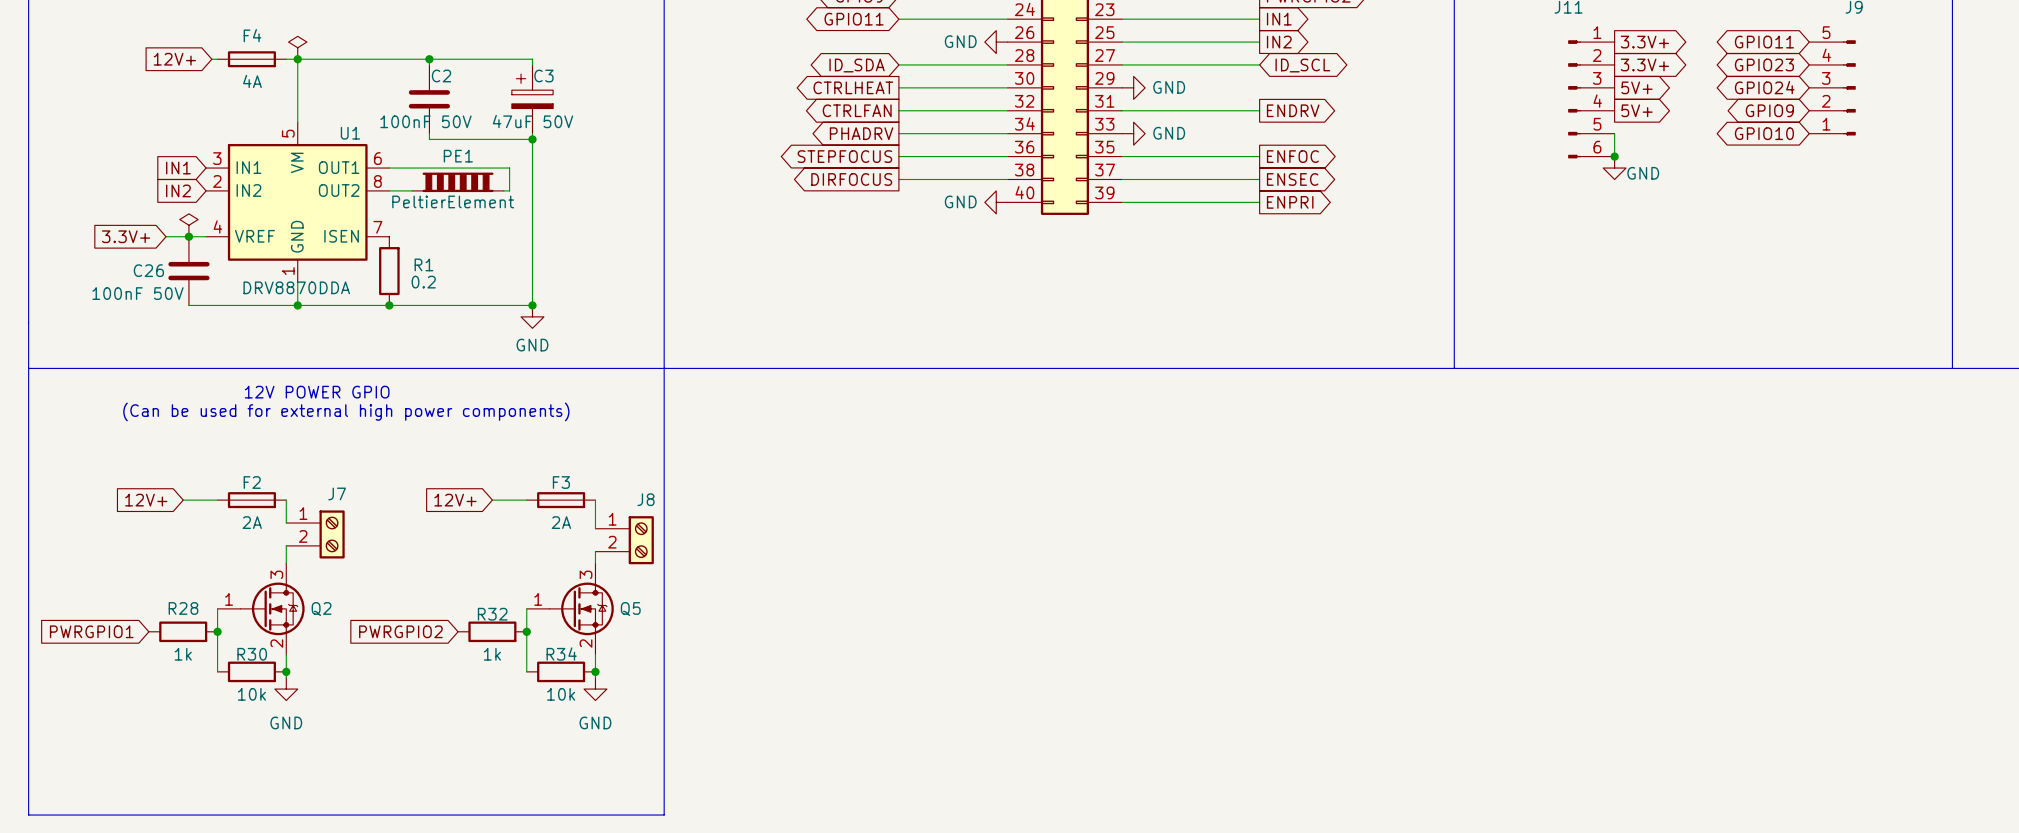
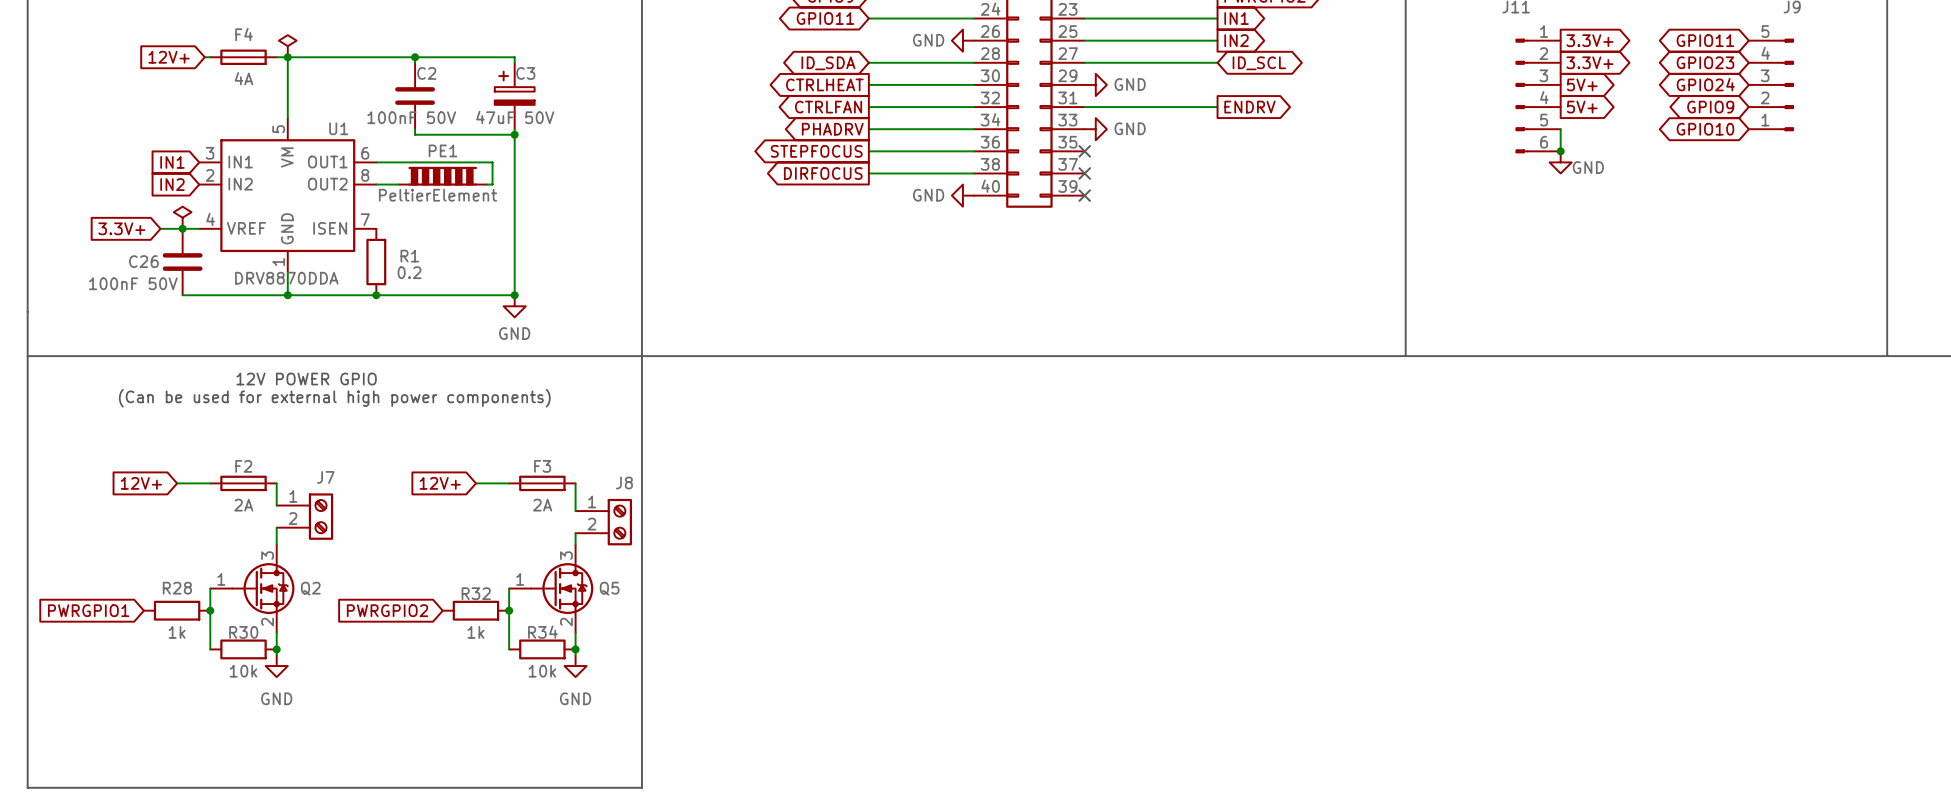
wire: (1122, 156) (1259, 156) -> none
no-connect mark: none -> (1084, 151)
global label: ENFOC (1292, 156) -> none
wire: (1122, 179) (1259, 179) -> none
no-connect mark: none -> (1084, 173)
global label: ENSEC (1292, 179) -> none
wire: (1122, 202) (1259, 202) -> none
no-connect mark: none -> (1084, 195)
global label: ENPRI (1290, 202) -> none

